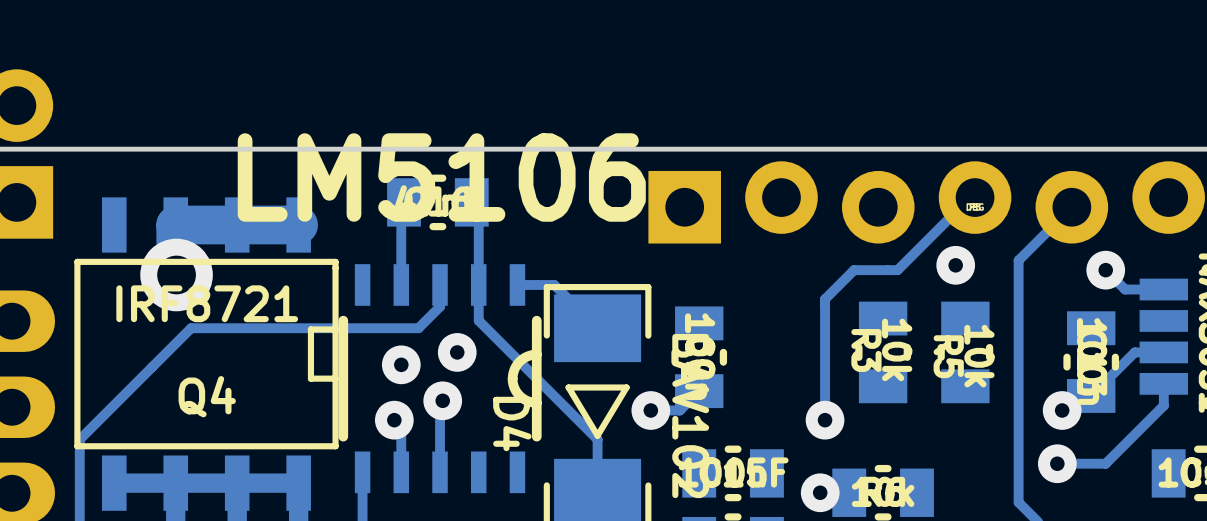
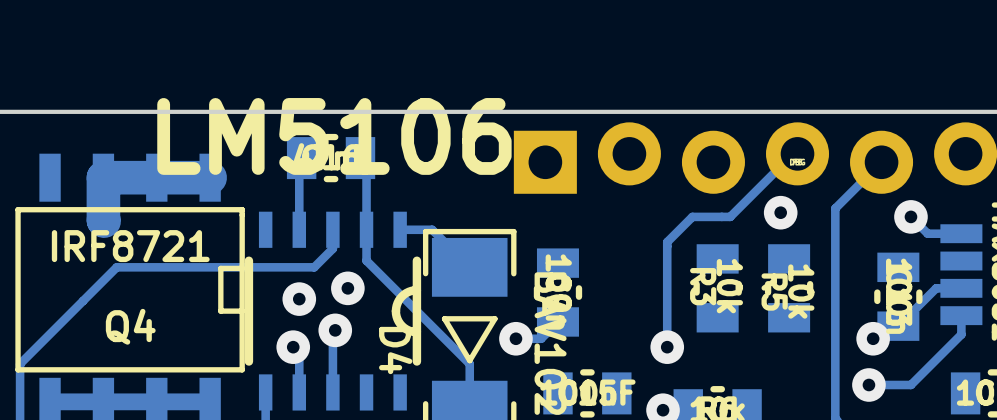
via: (176, 274) -> none

